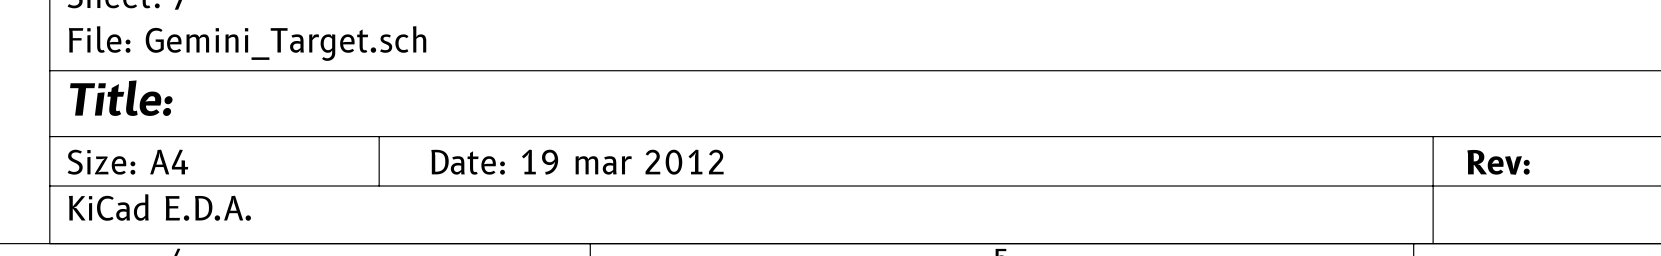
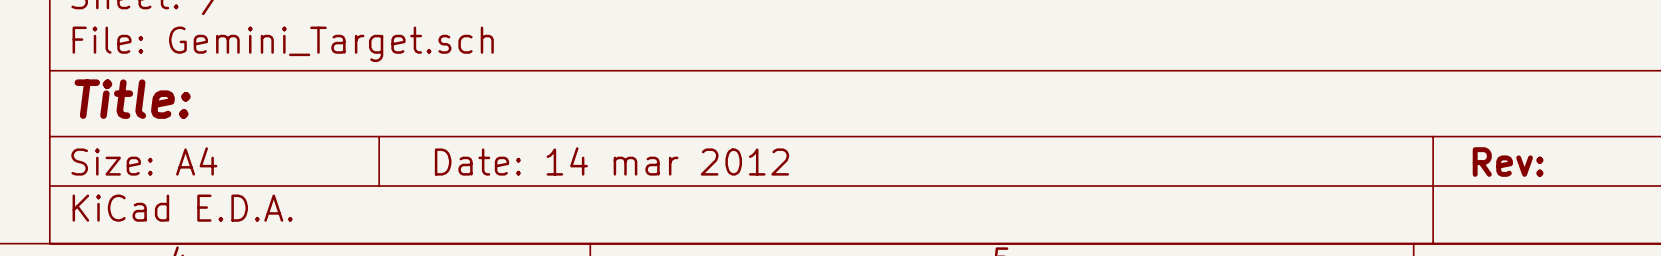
title block: Date: 19 mar 2012 (577, 162) -> Date: 14 mar 2012 (611, 161)

